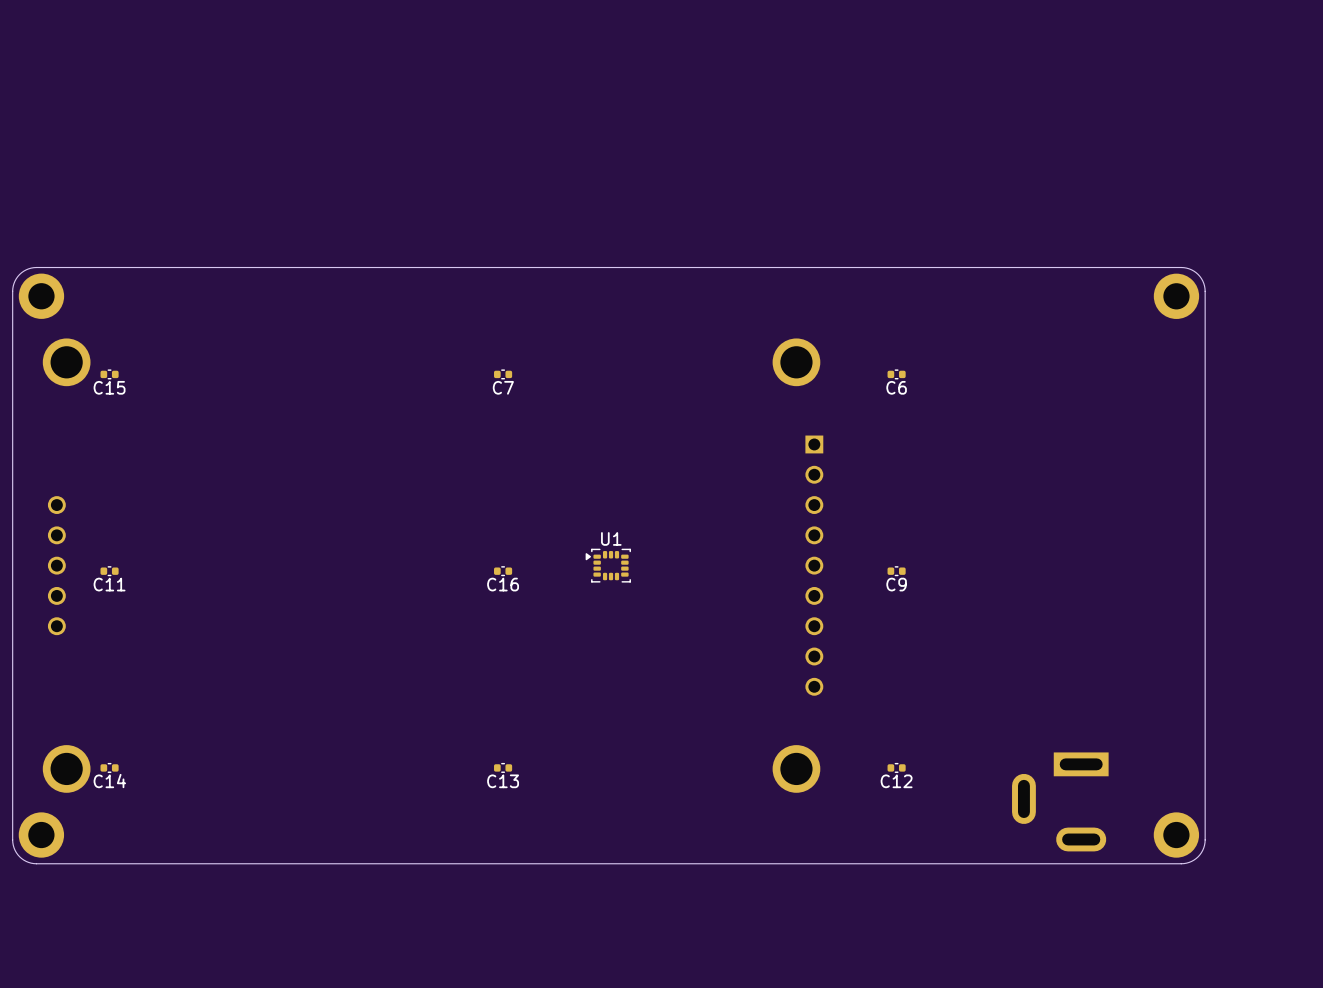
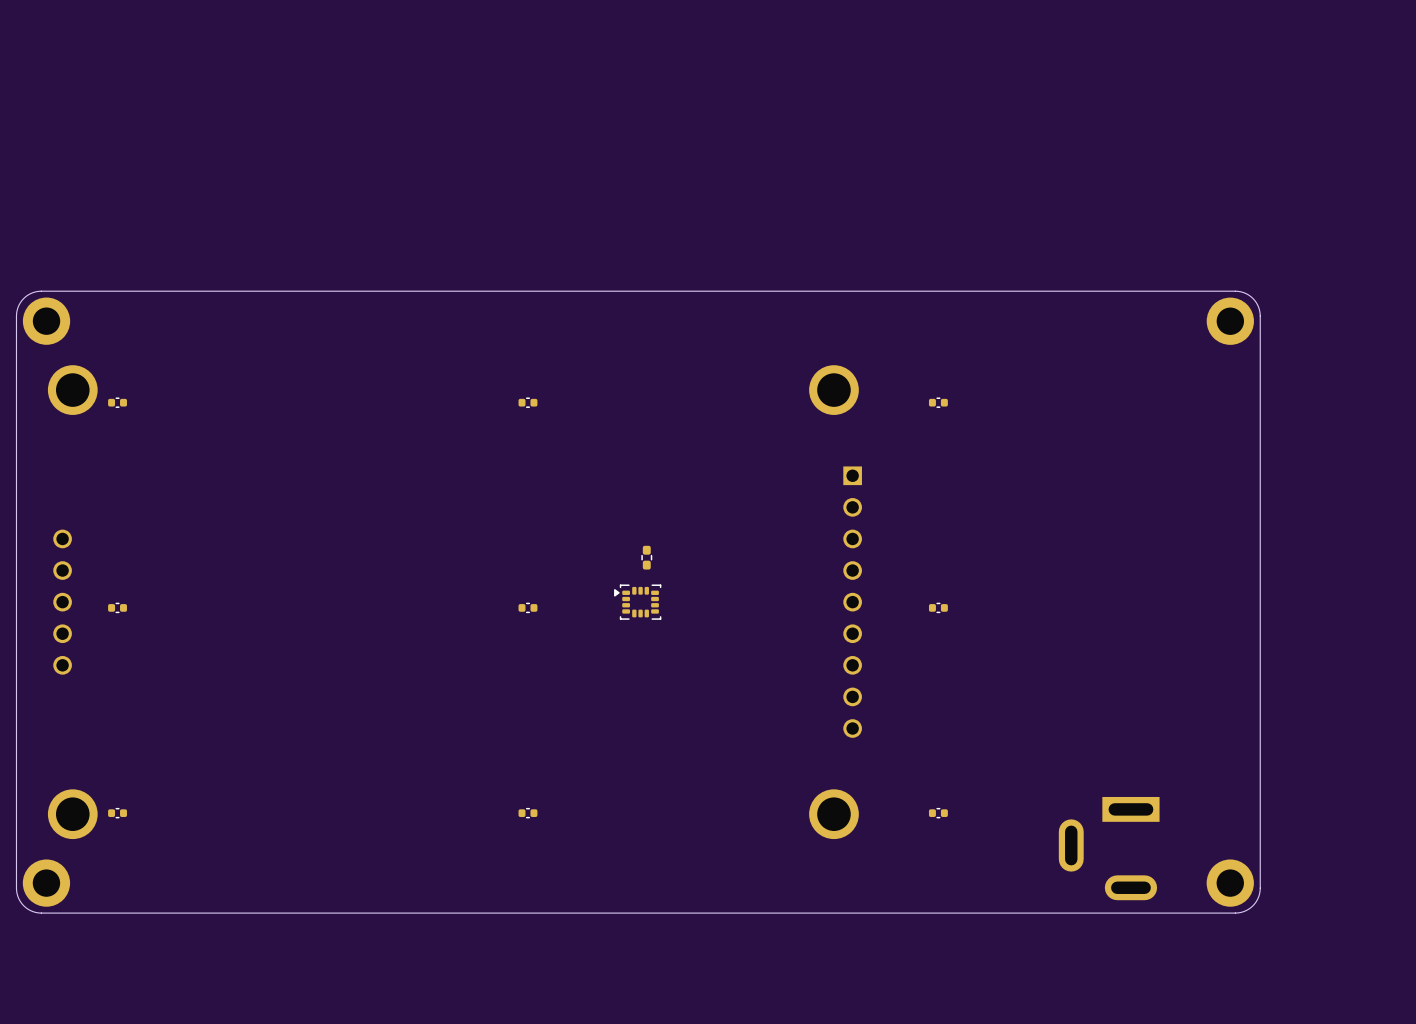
C15 name: C15 (109, 387) -> none
C7 name: C7 (503, 387) -> none
C6 name: C6 (896, 387) -> none
part: none -> (646, 557)
U1 name: U1 (611, 538) -> none
C11 name: C11 (109, 584) -> none
C16 name: C16 (503, 584) -> none
C9 name: C9 (896, 584) -> none
C14 name: C14 (109, 781) -> none
C13 name: C13 (503, 781) -> none
C12 name: C12 (896, 781) -> none

